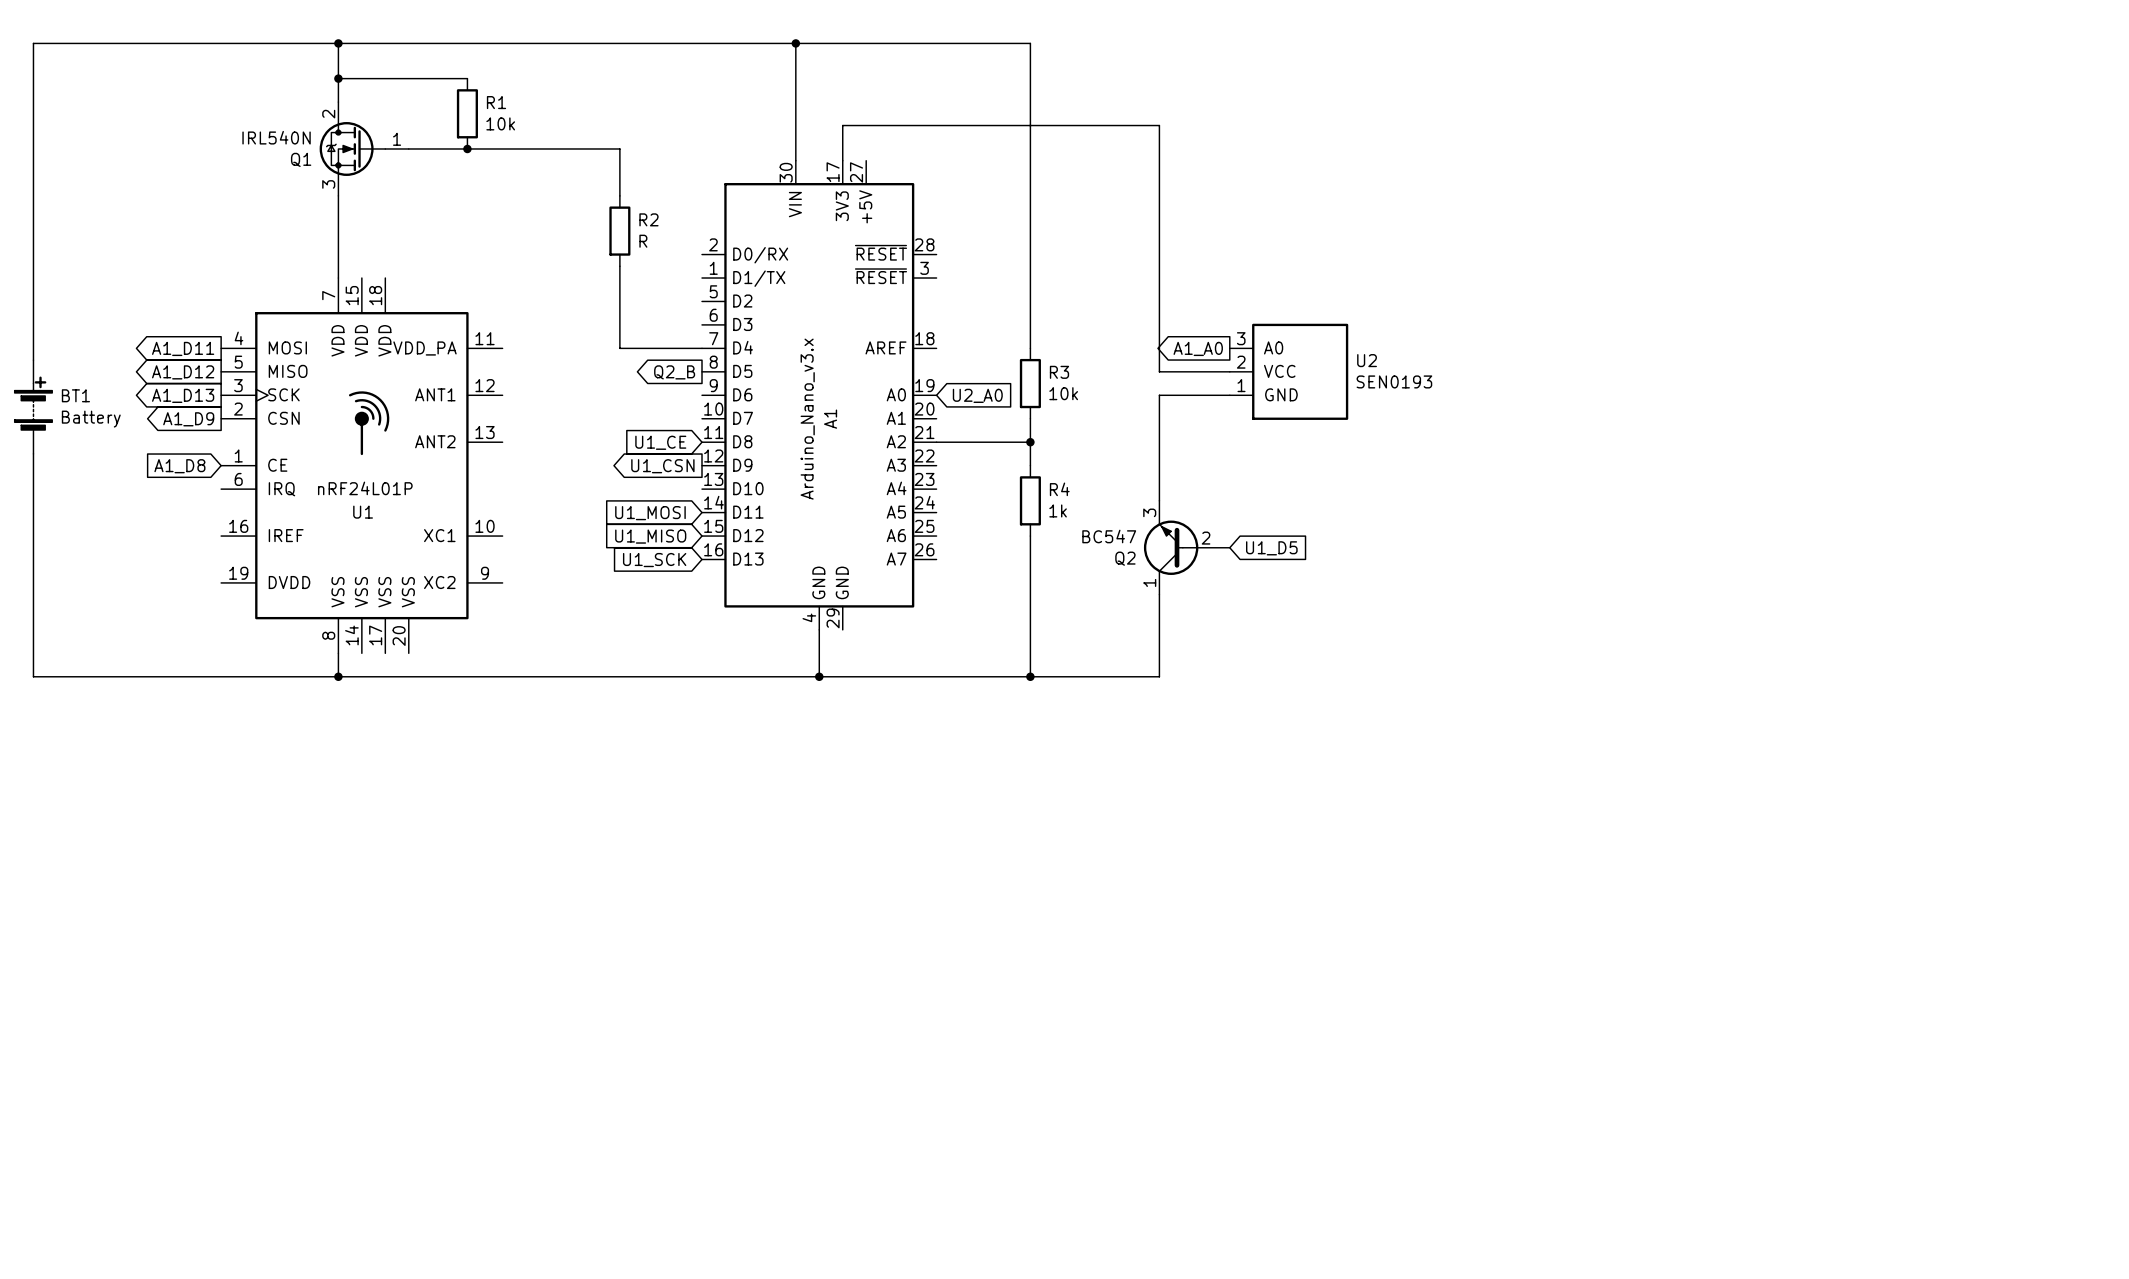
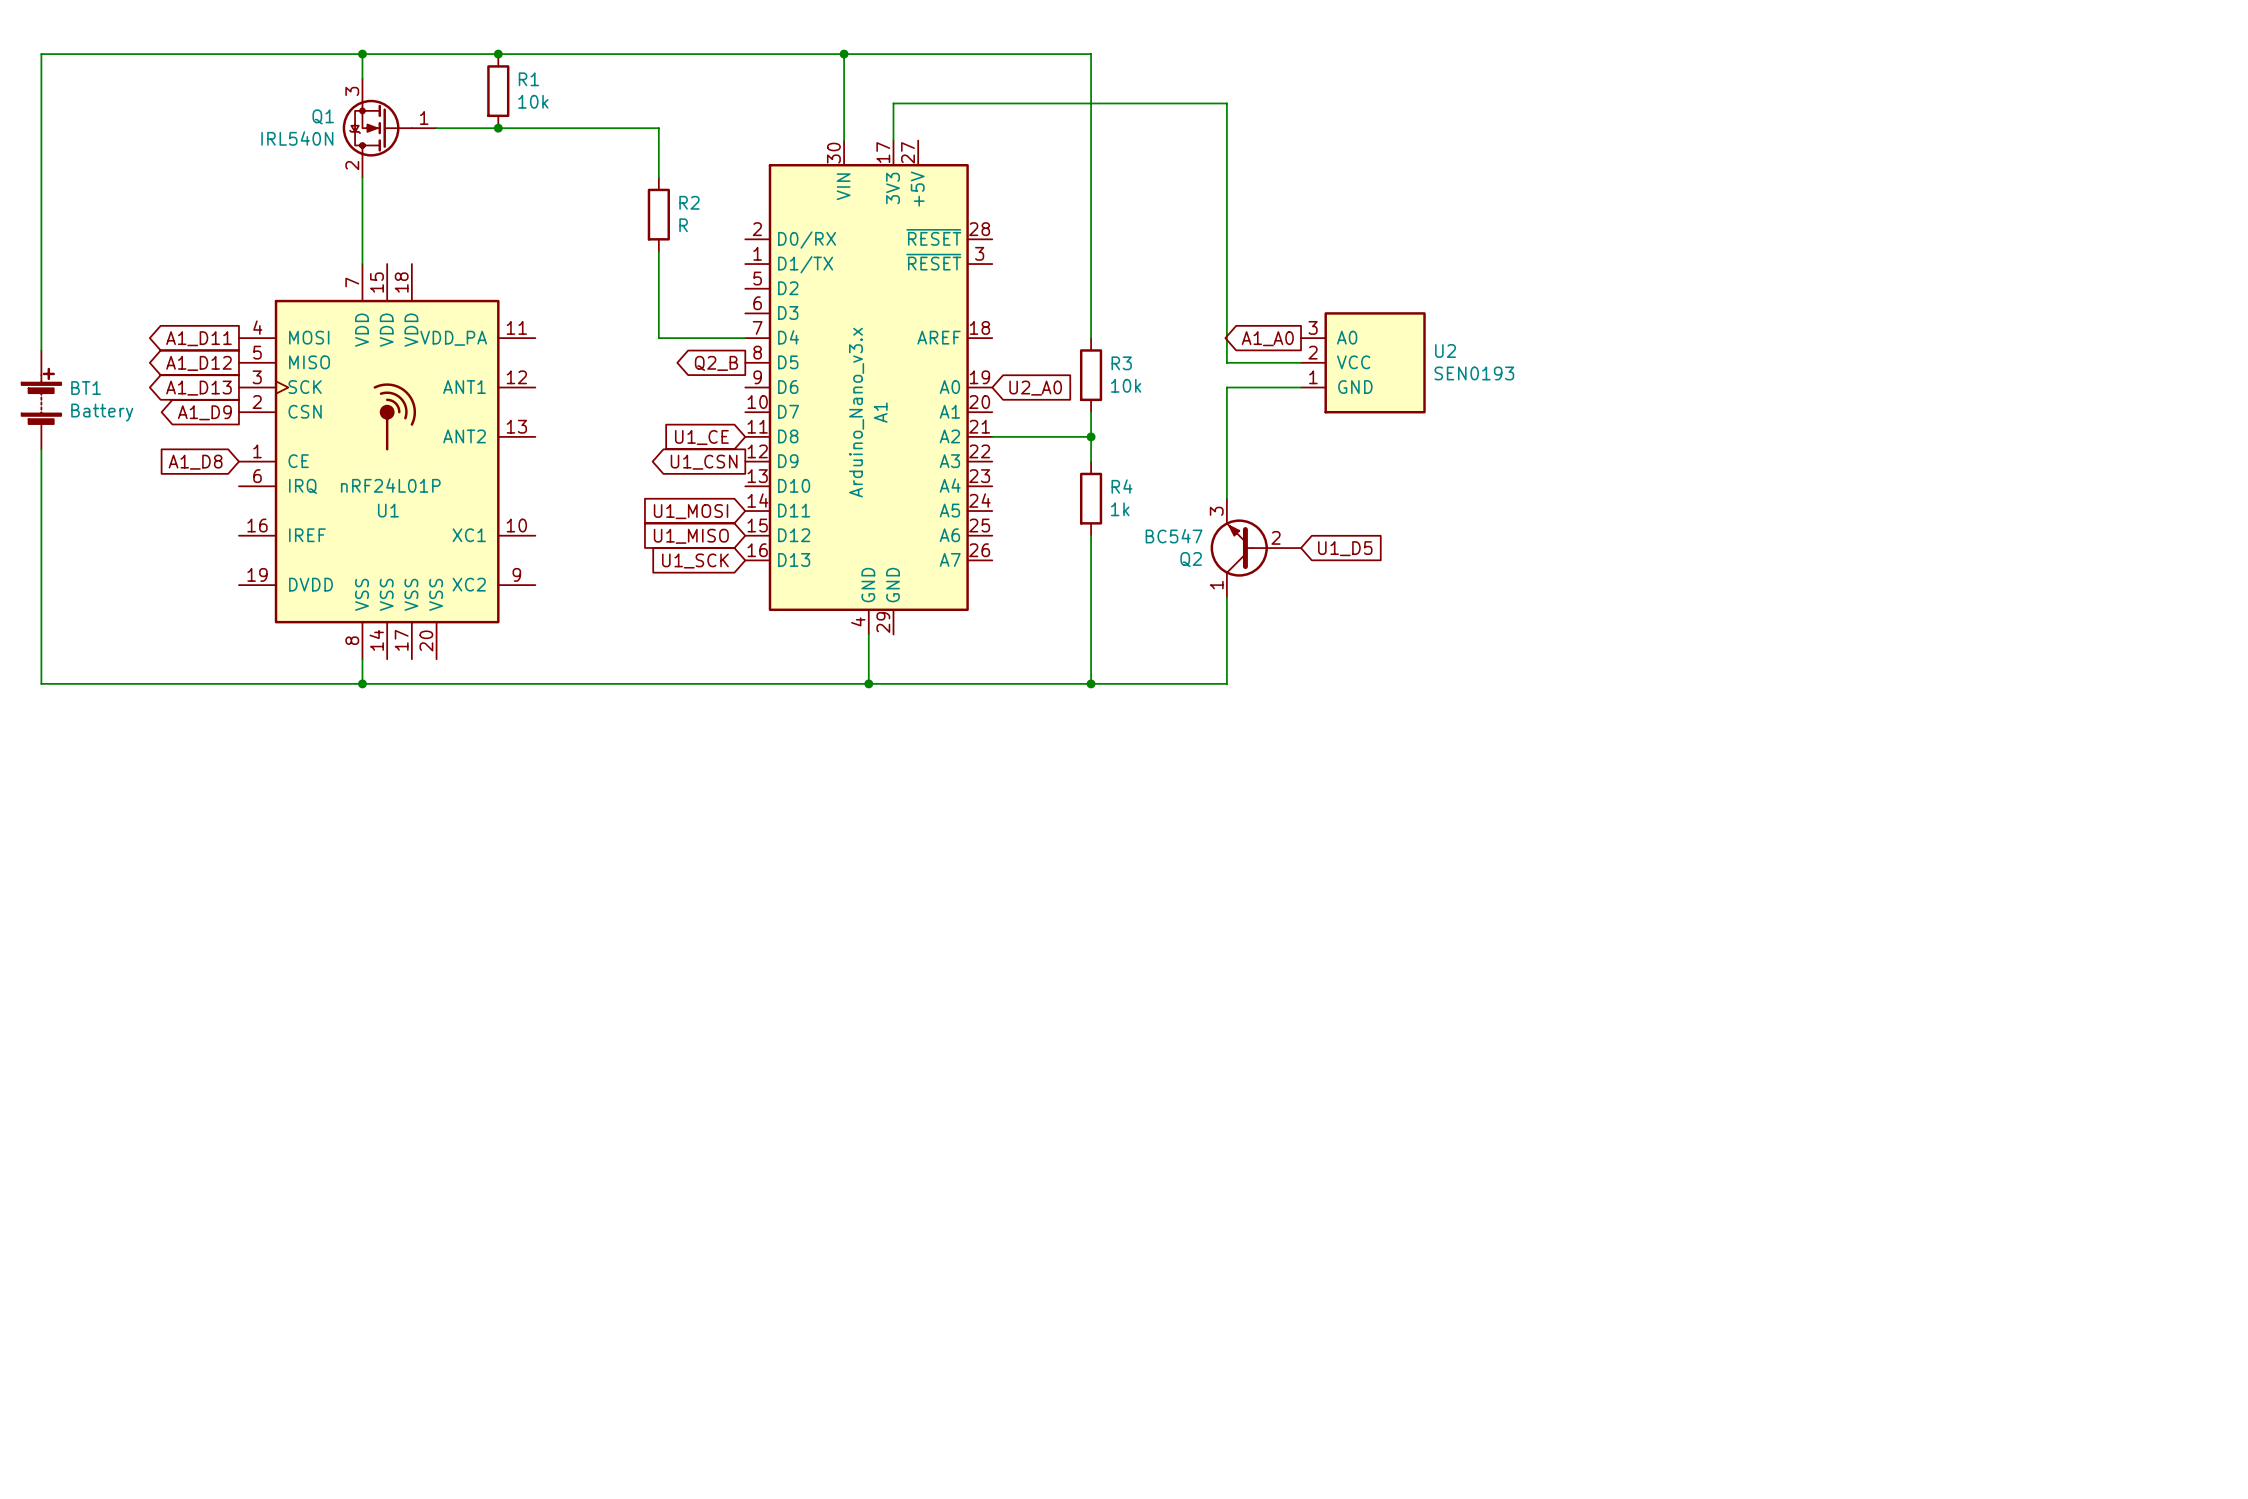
wire: (338, 43) (338, 78) -> (41, 54) (362, 54)
junction: (338, 43) -> none
wire: (795, 43) (795, 78) -> none
junction position: (795, 43) -> (844, 54)
wire: (33, 78) (33, 43) (1030, 43) (1030, 78) -> (498, 54) (1091, 54)
junction: none -> (498, 54)
Q1 flip: as is (352, 148) -> up-down (377, 128)

